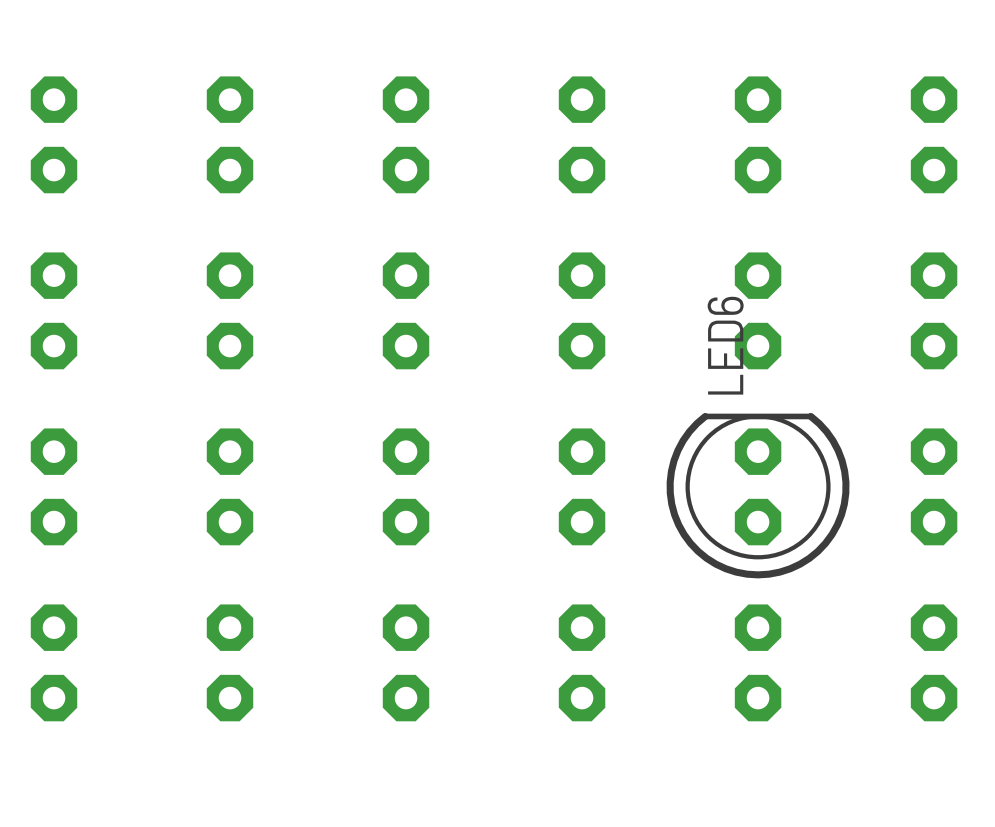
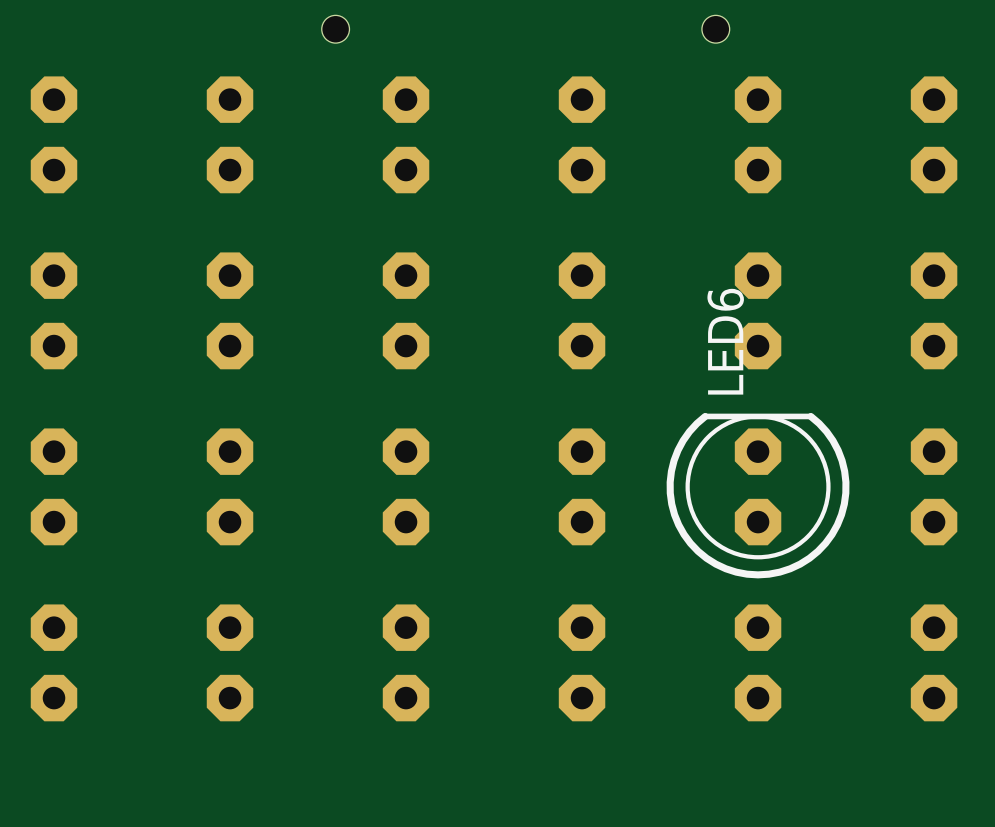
hole: none -> (335, 29)
hole: none -> (715, 29)

